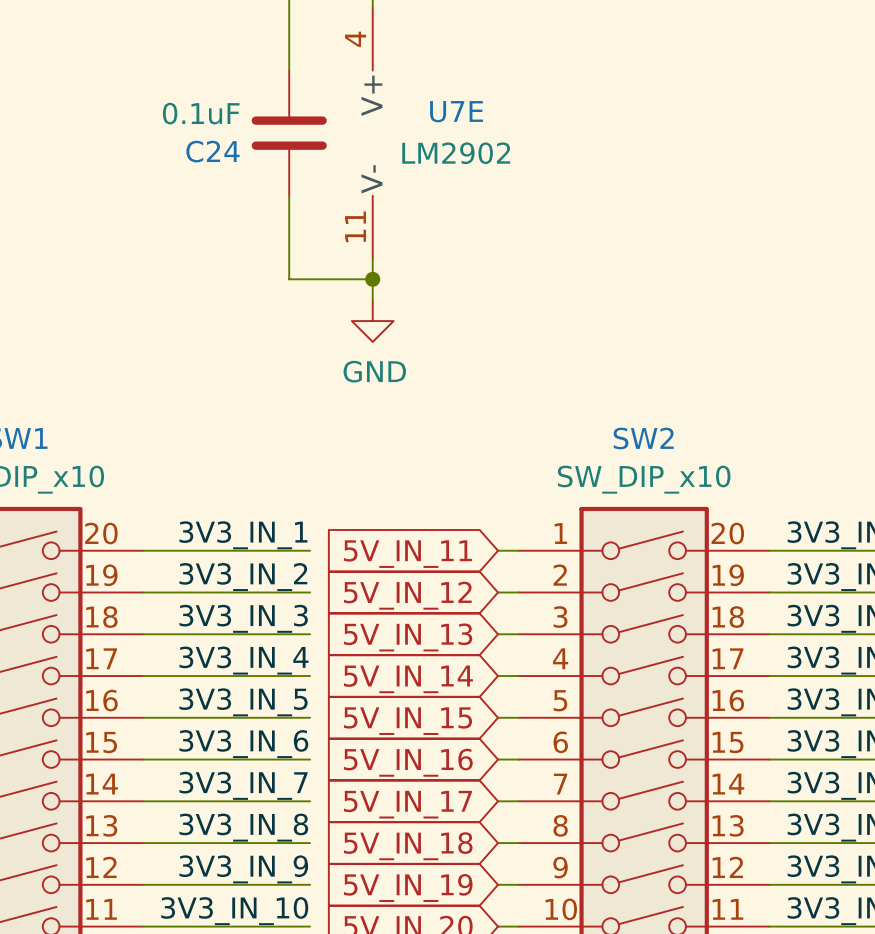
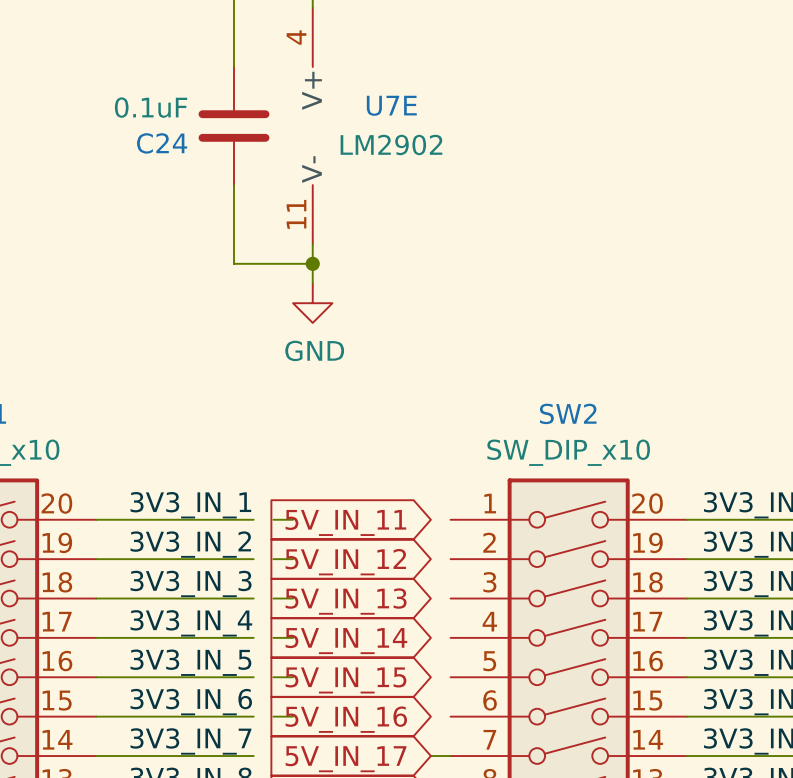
wire: (498, 550) (518, 550) -> (273, 519) (293, 519)
wire: (498, 592) (518, 592) -> (273, 559) (293, 559)
wire: (498, 634) (518, 634) -> (273, 598) (293, 598)
wire: (498, 676) (518, 676) -> (273, 637) (293, 637)
wire: (498, 717) (518, 717) -> (273, 677) (293, 677)
wire: (498, 759) (518, 759) -> (273, 716) (293, 716)

